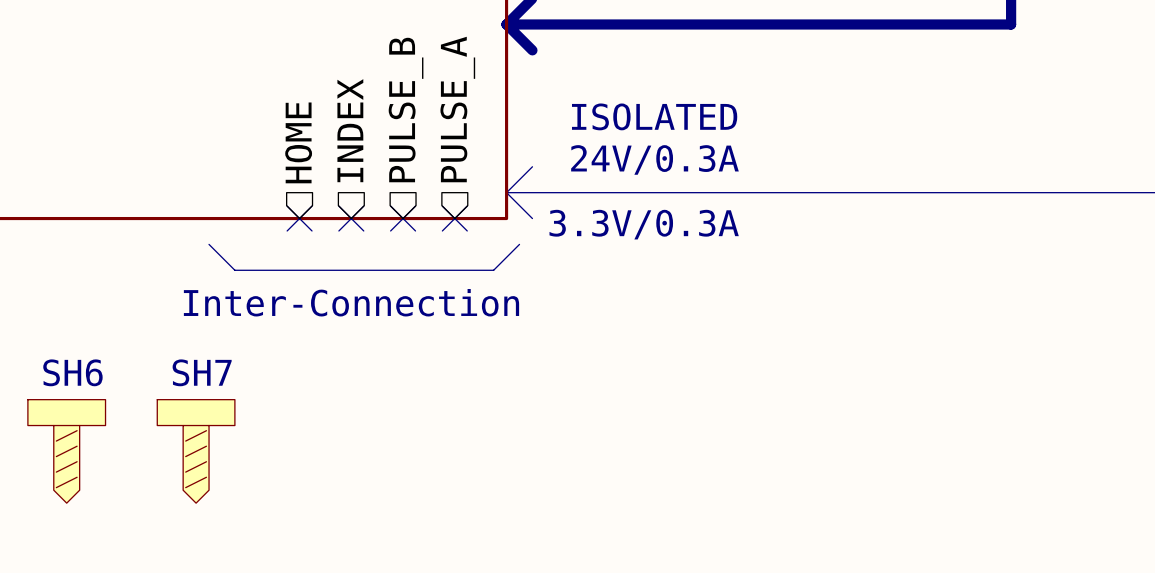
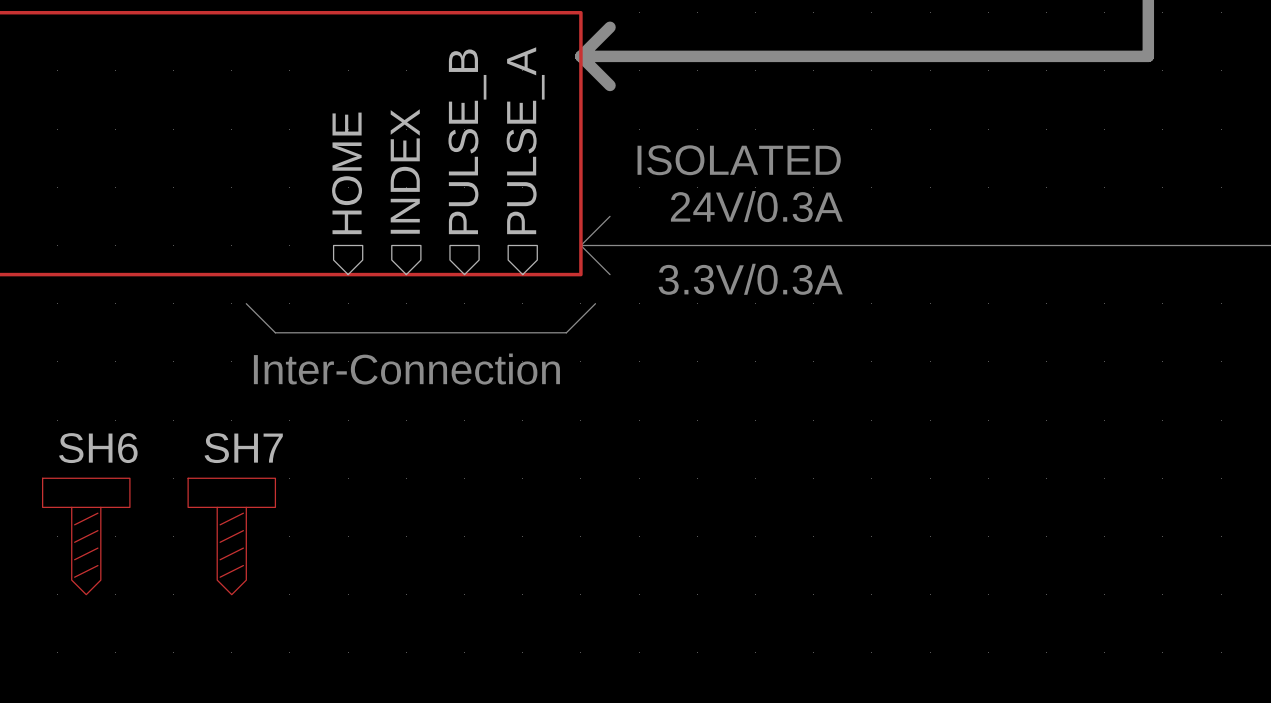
no-connect mark: (299, 218) -> none
no-connect mark: (351, 218) -> none
no-connect mark: (403, 218) -> none
no-connect mark: (454, 218) -> none

